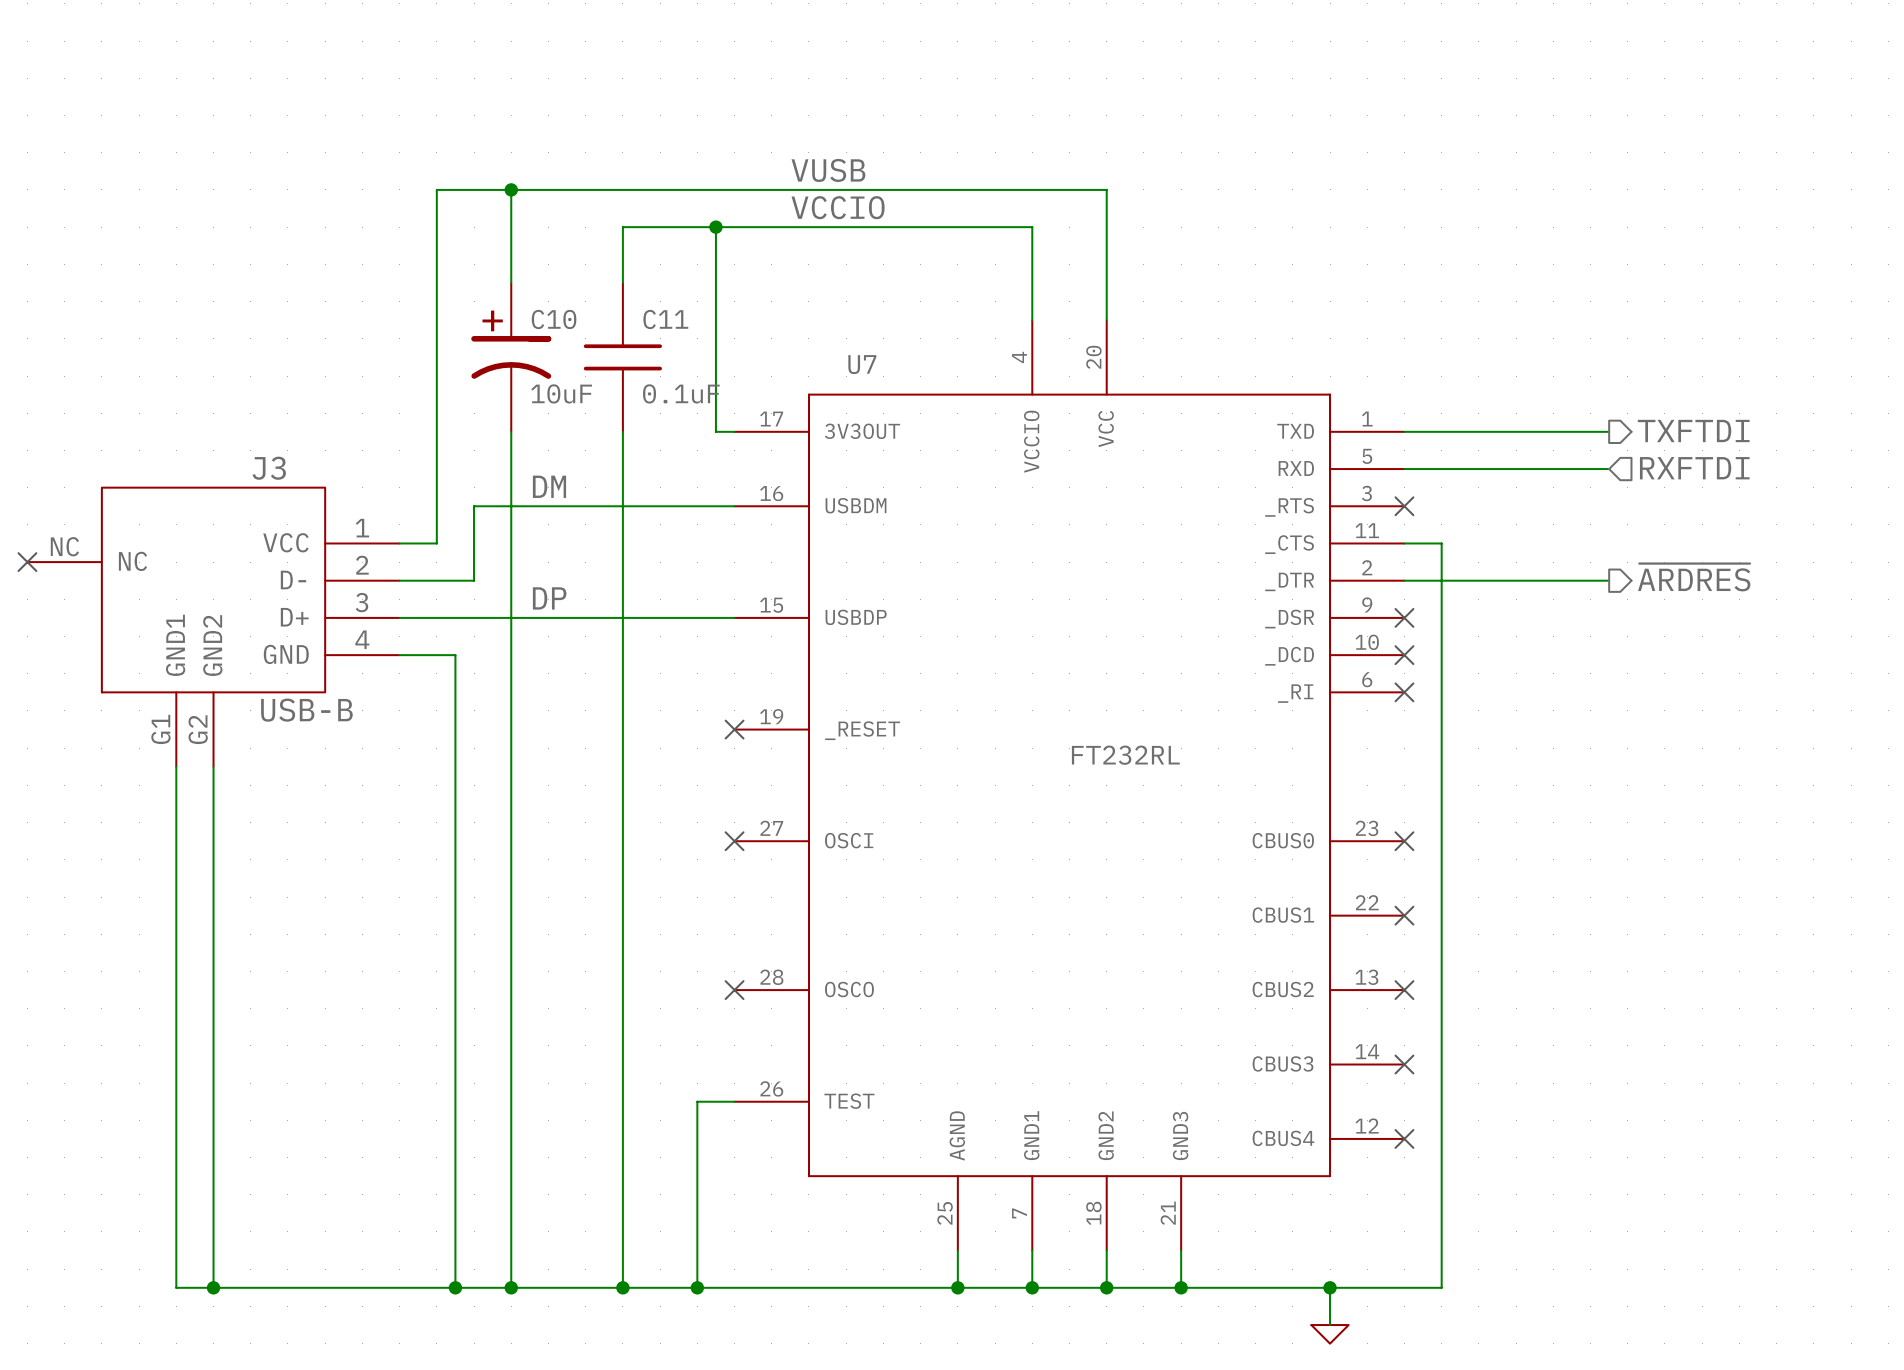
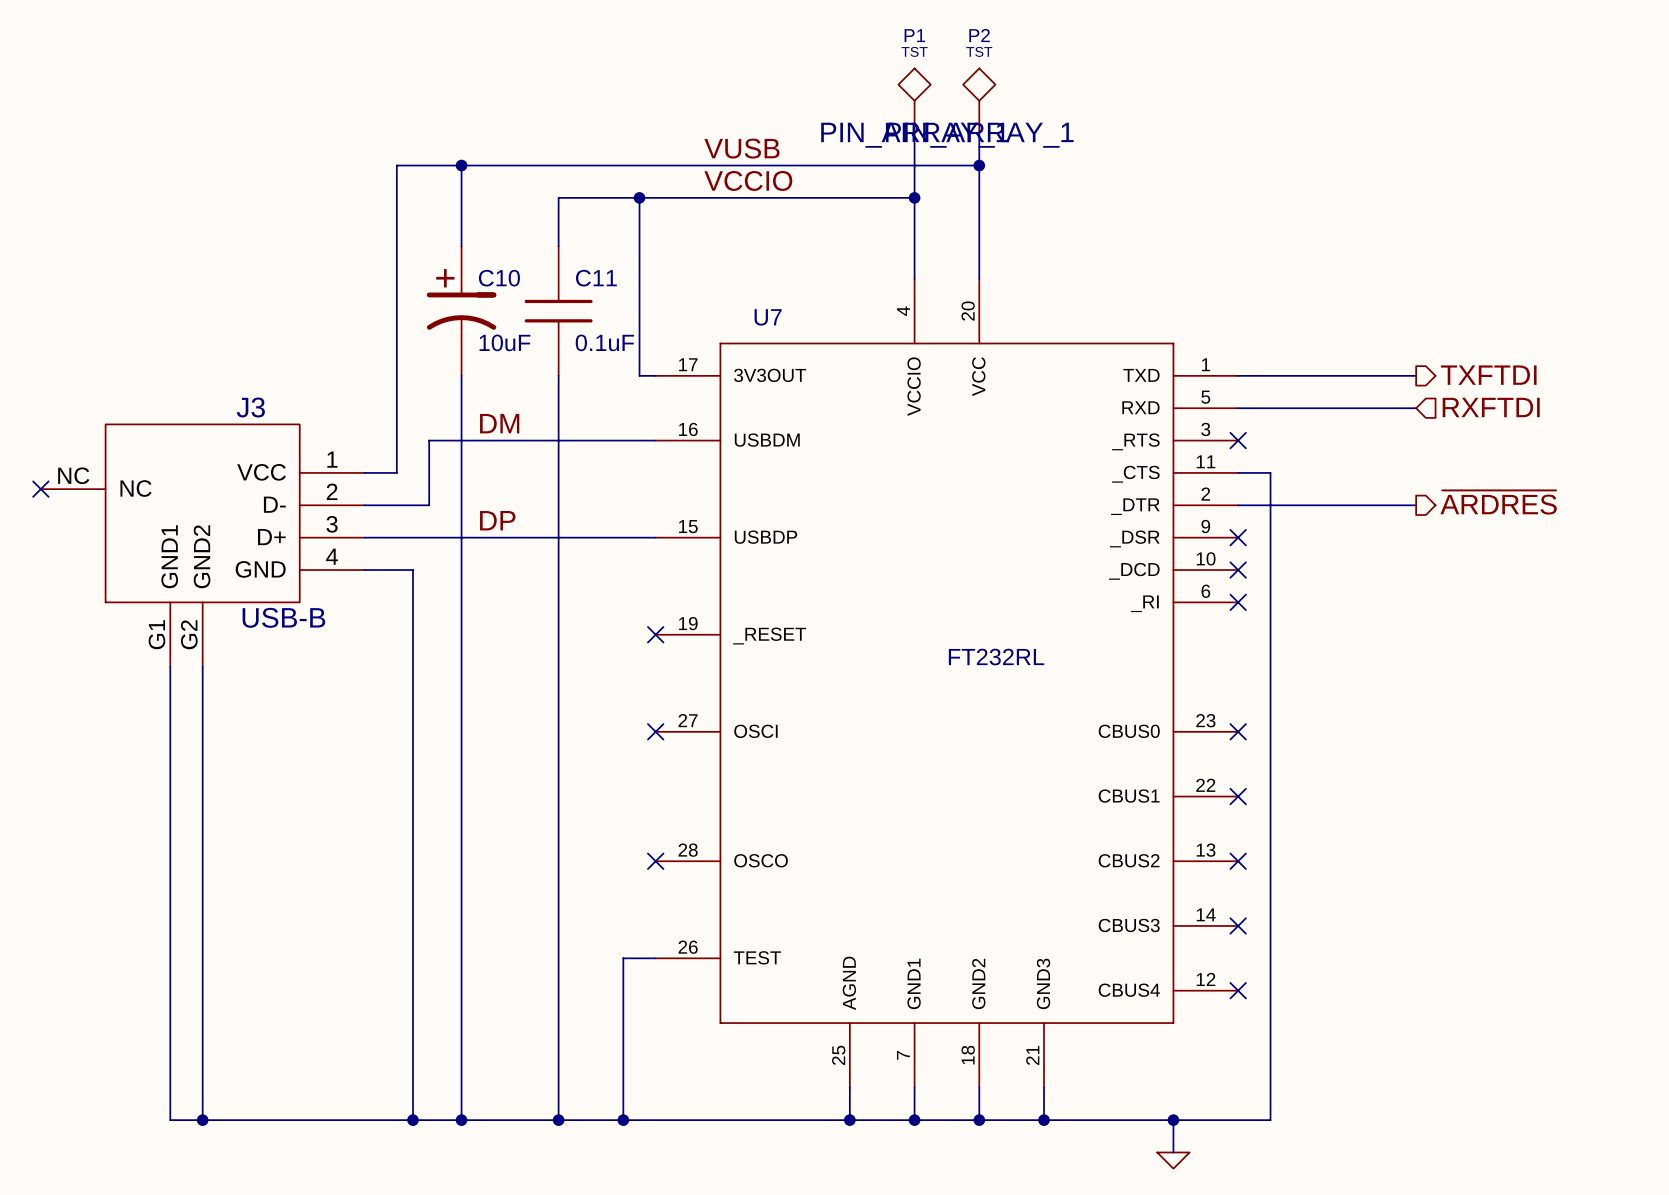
P1: none -> TST (914, 100)
P2: none -> TST (979, 100)
wire: none -> (914, 133) (914, 197)
wire: none -> (979, 133) (979, 165)
junction: none -> (979, 165)
junction: none -> (914, 197)

